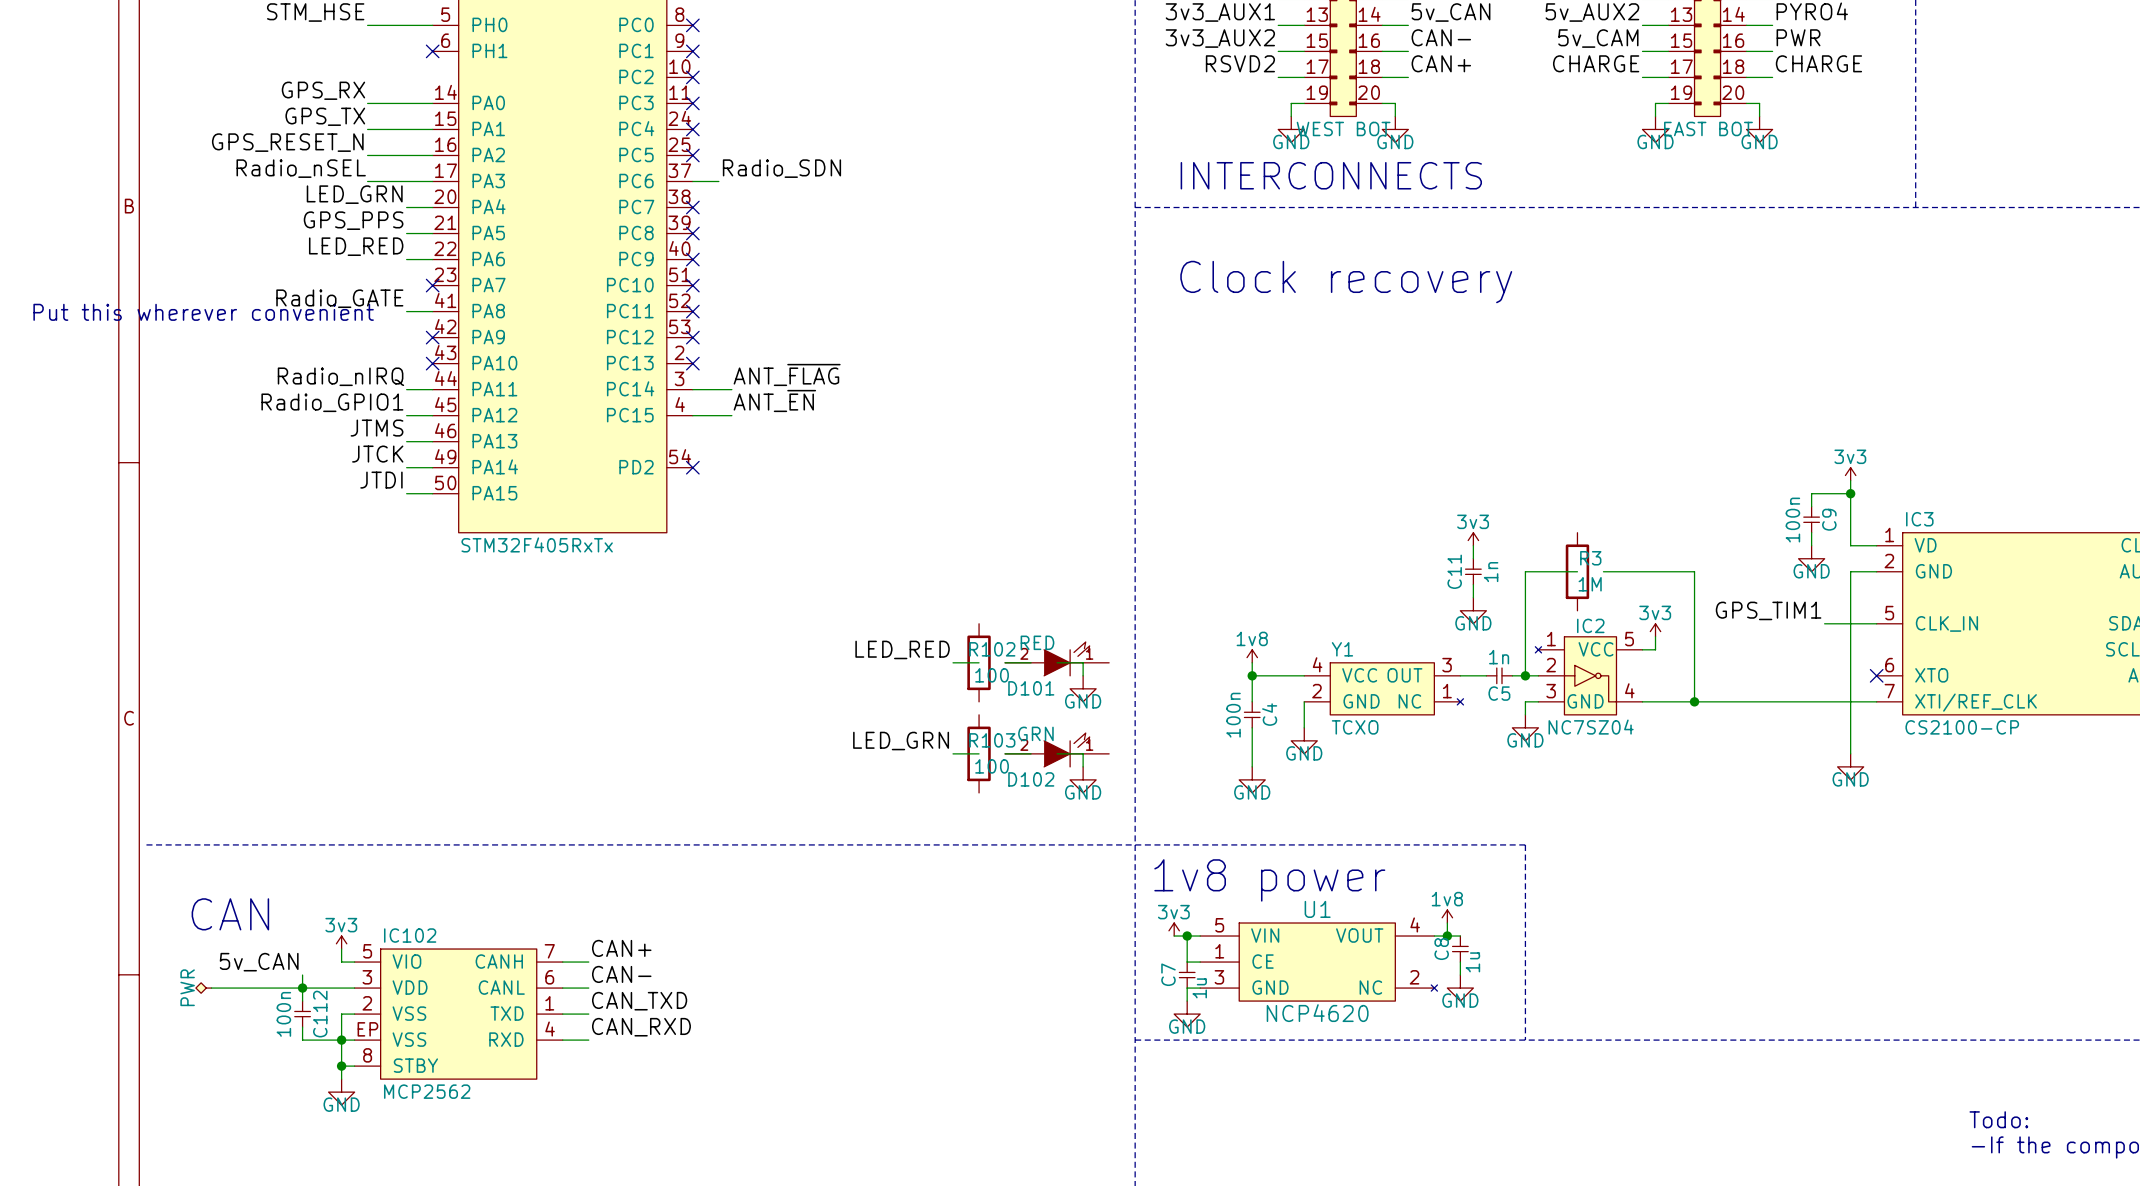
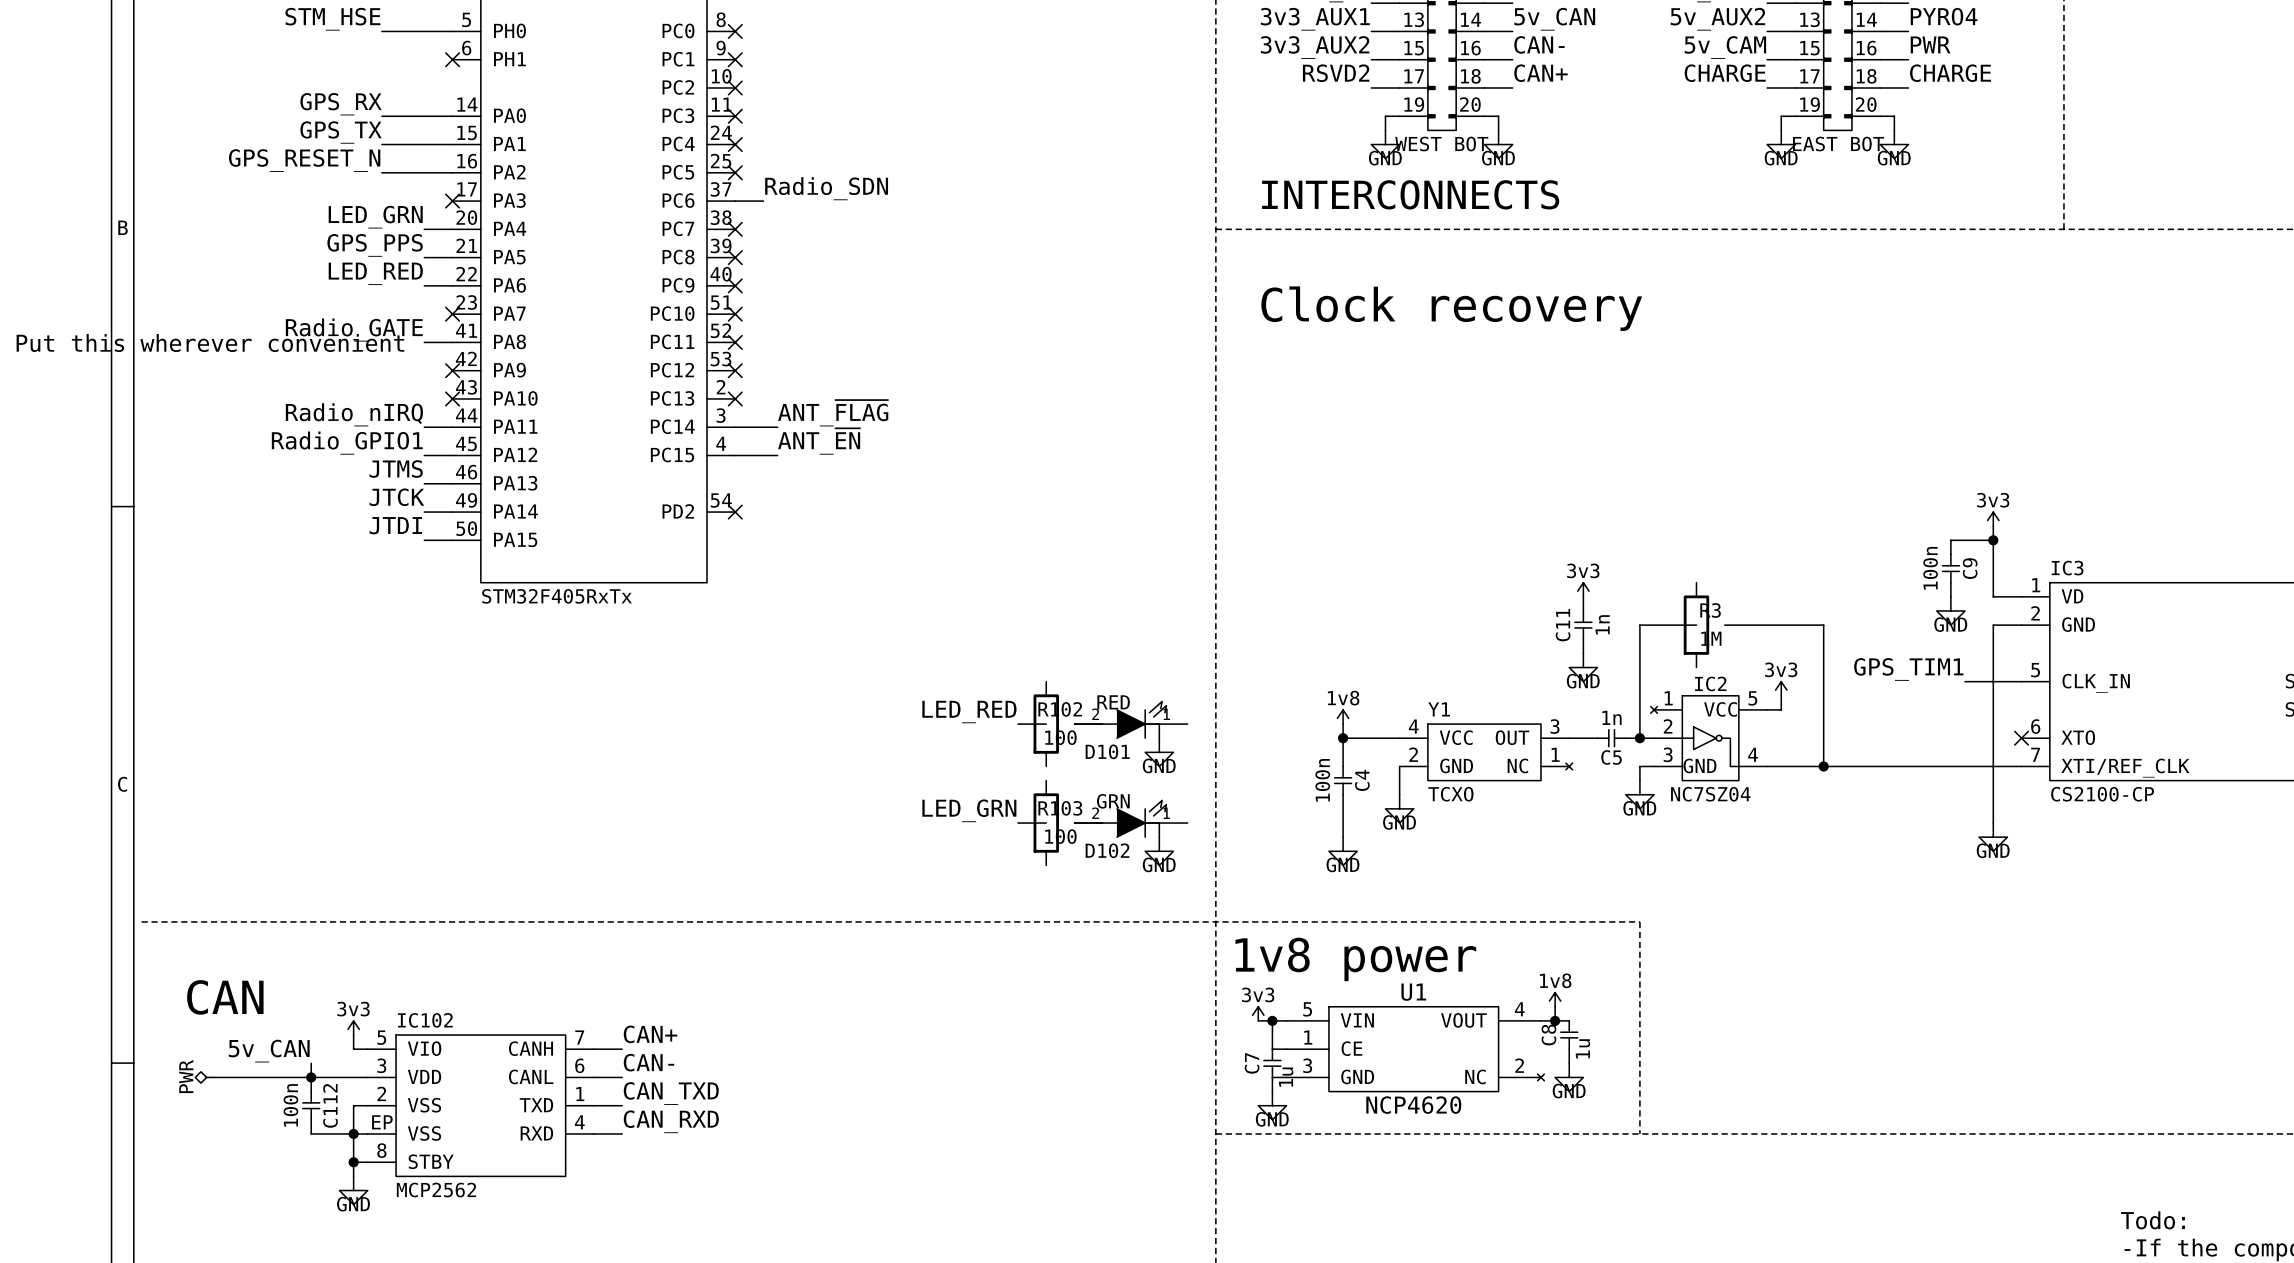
label: Radio_nSEL (301, 168) -> none
wire: (367, 181) (432, 181) -> none
no-connect mark: none -> (452, 201)

